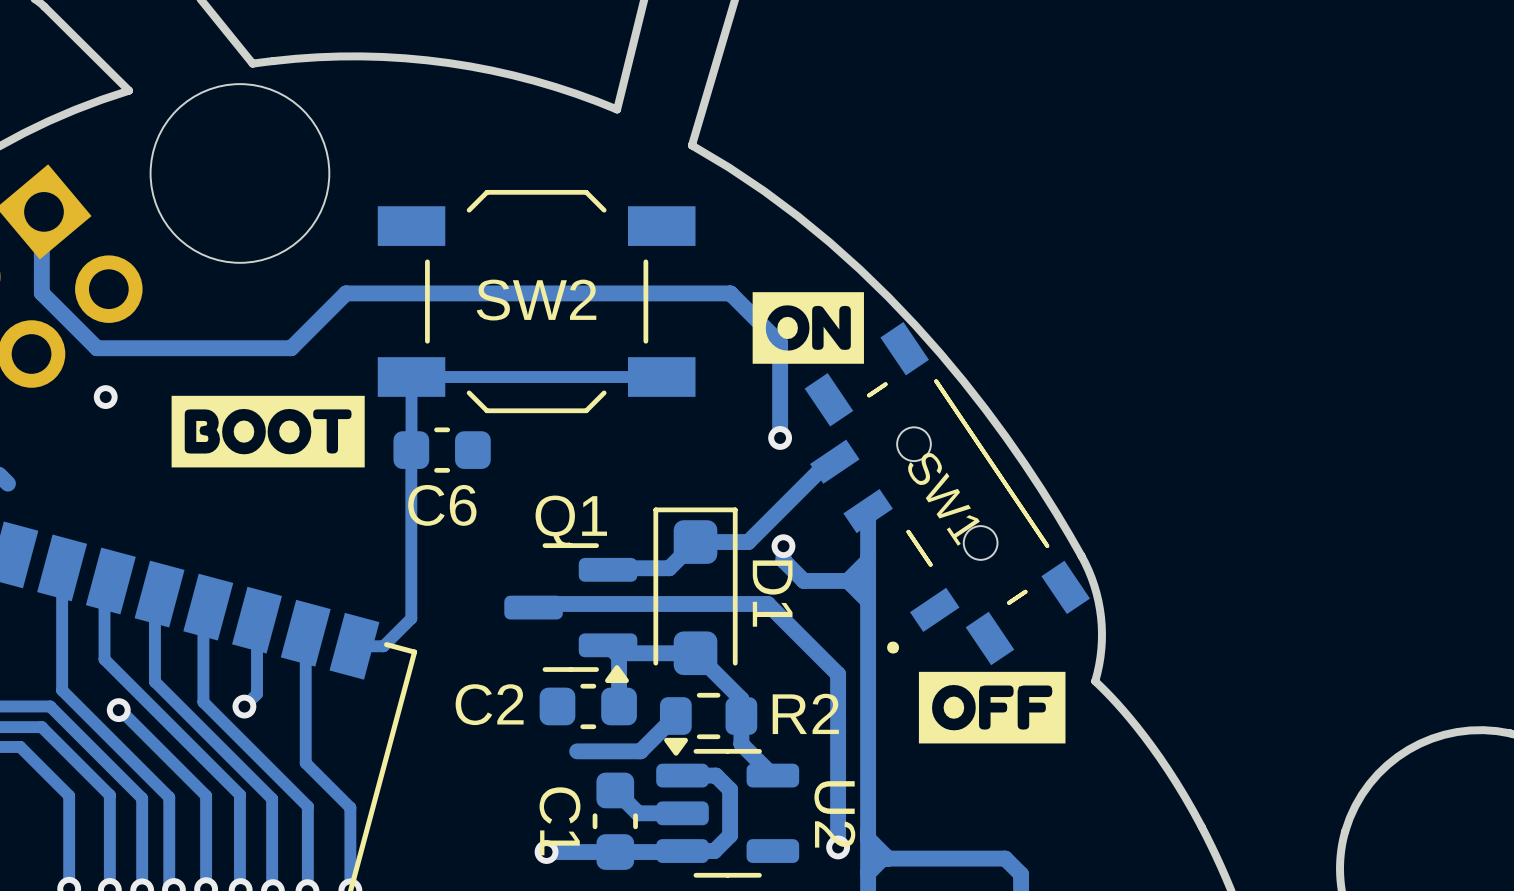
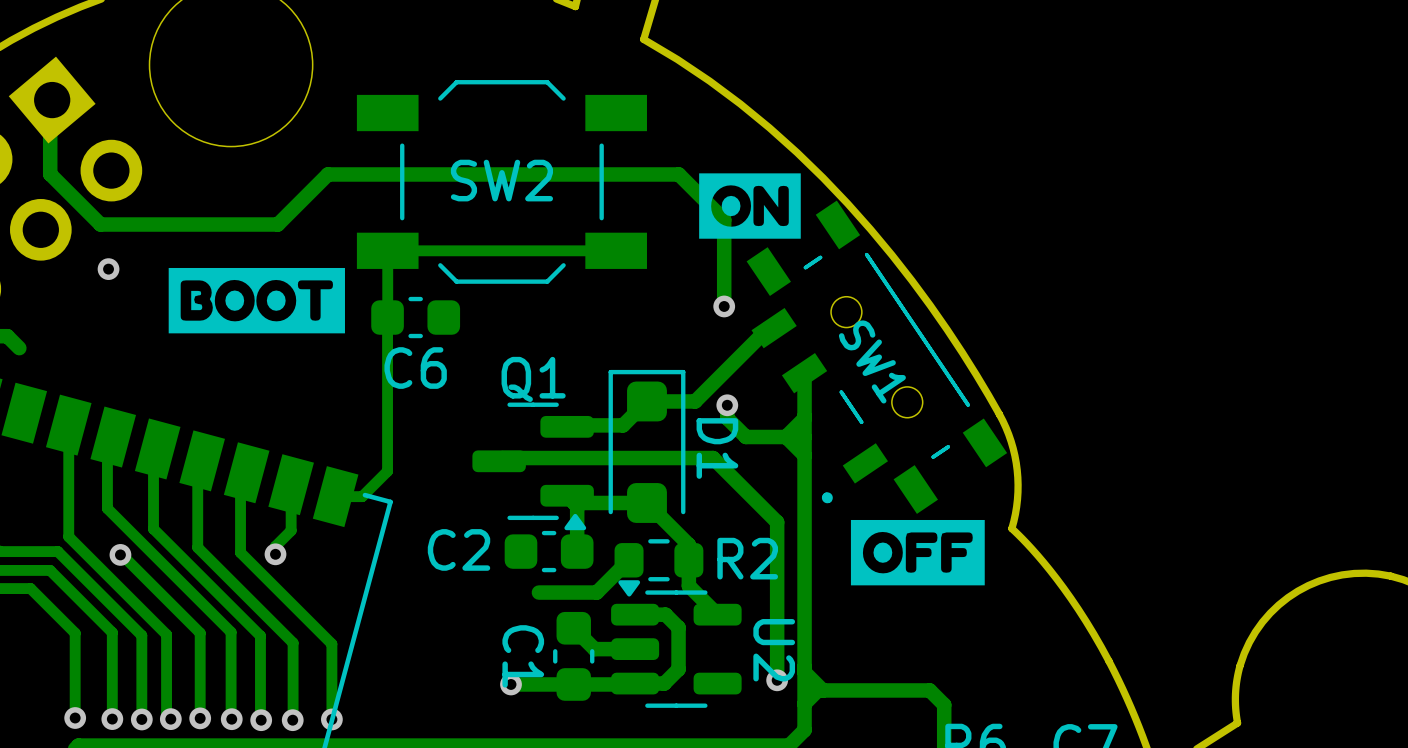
track: (257, 620) (257, 693) (244, 706) -> (246, 472) (240, 478) (240, 552) (291, 603)
track: (305, 683) (305, 763) -> (291, 530) (275, 546) (275, 554)
via position: (244, 706) -> (275, 554)

